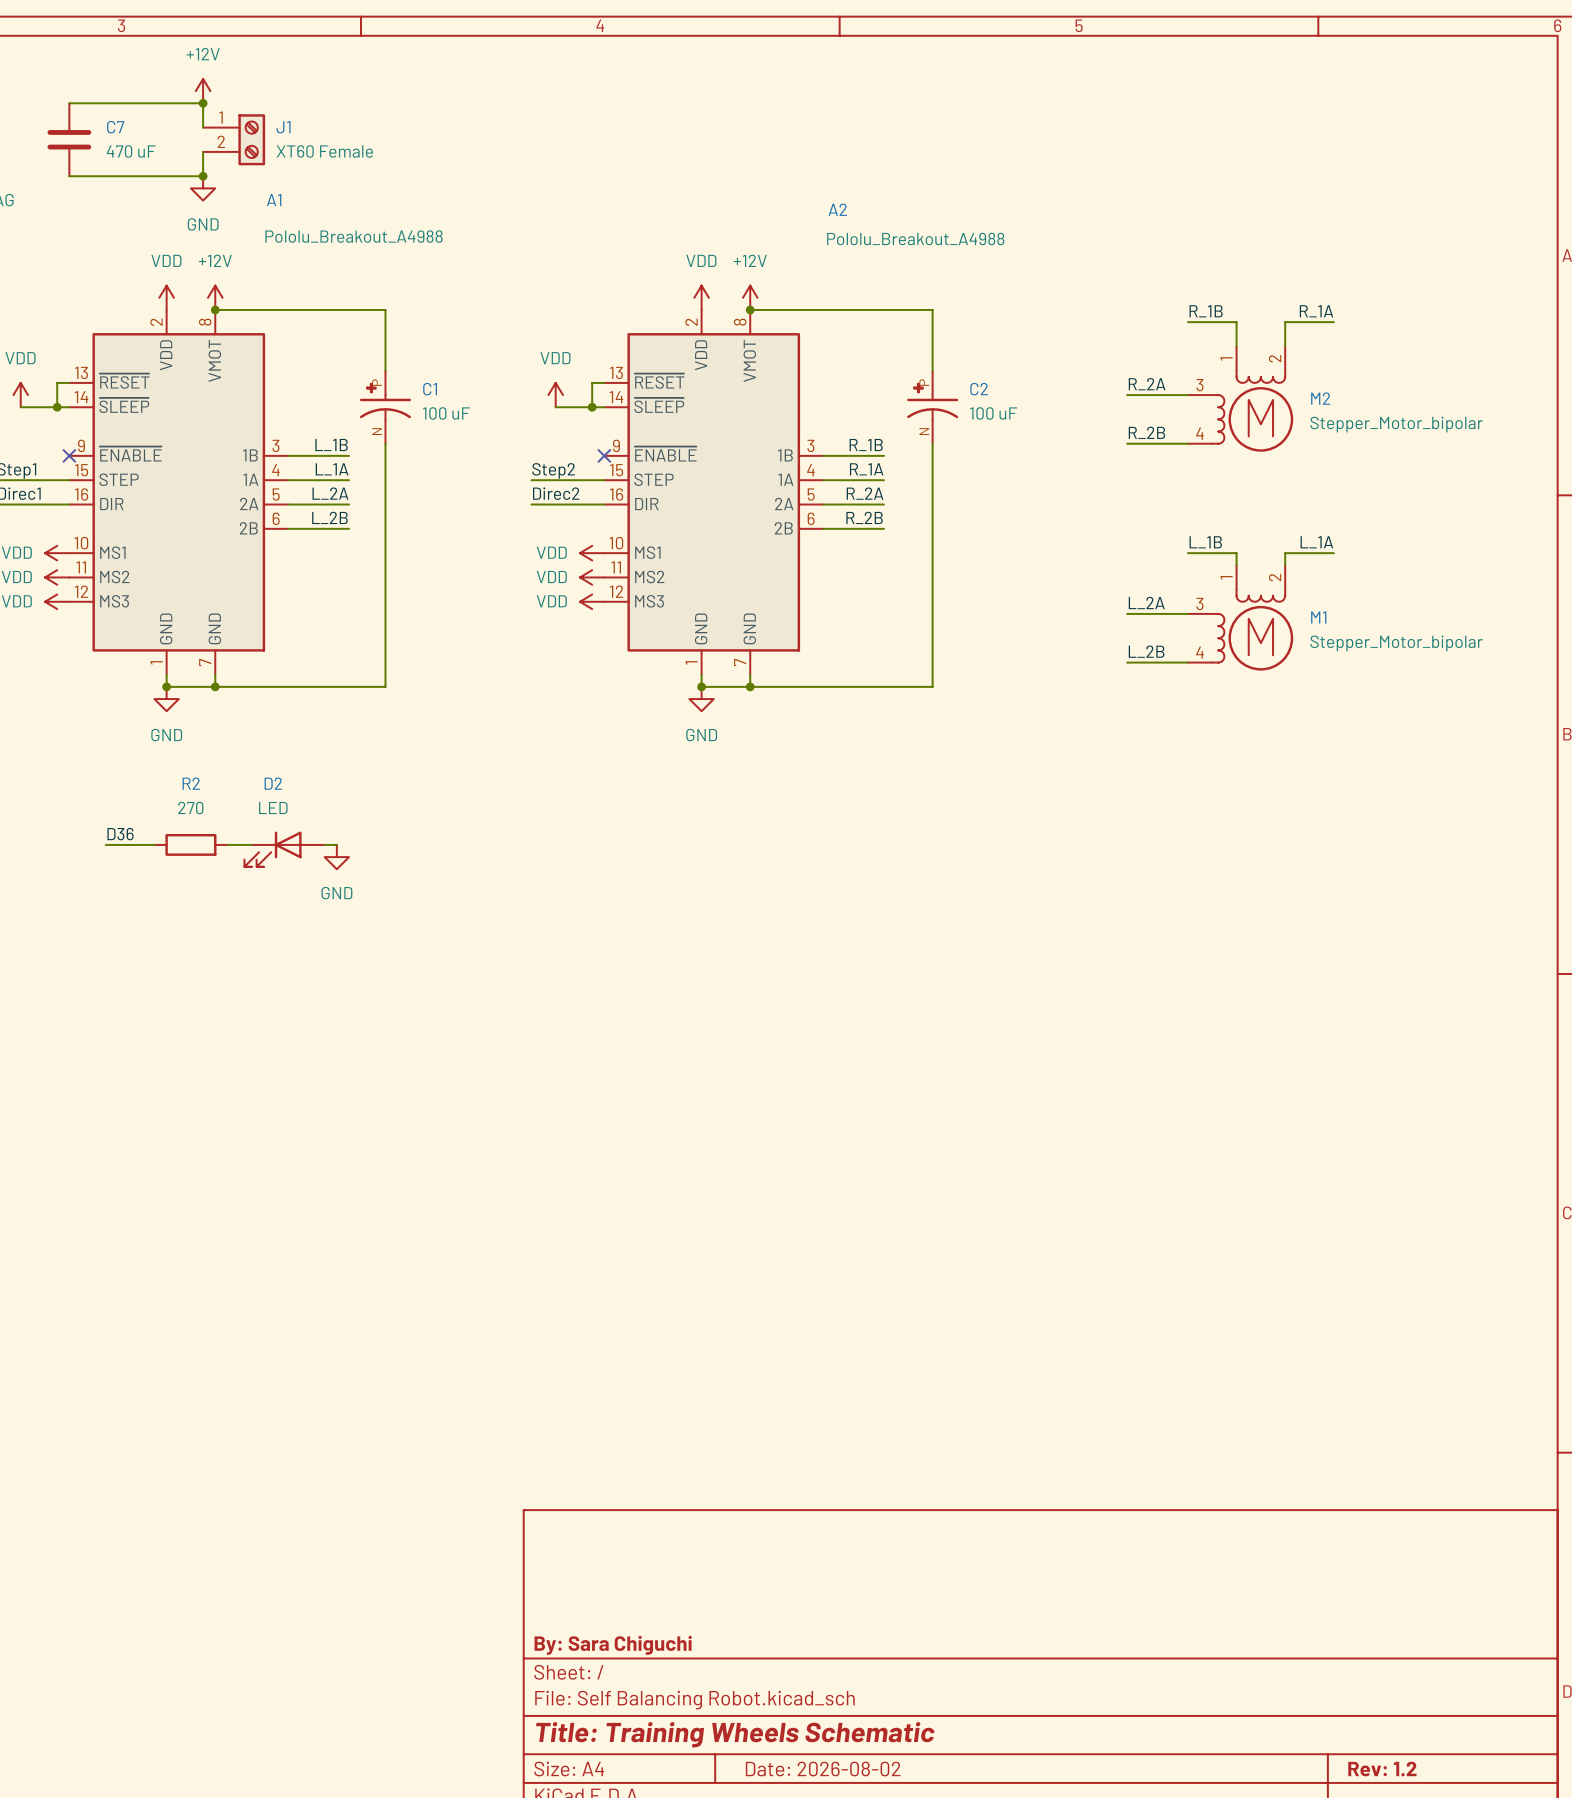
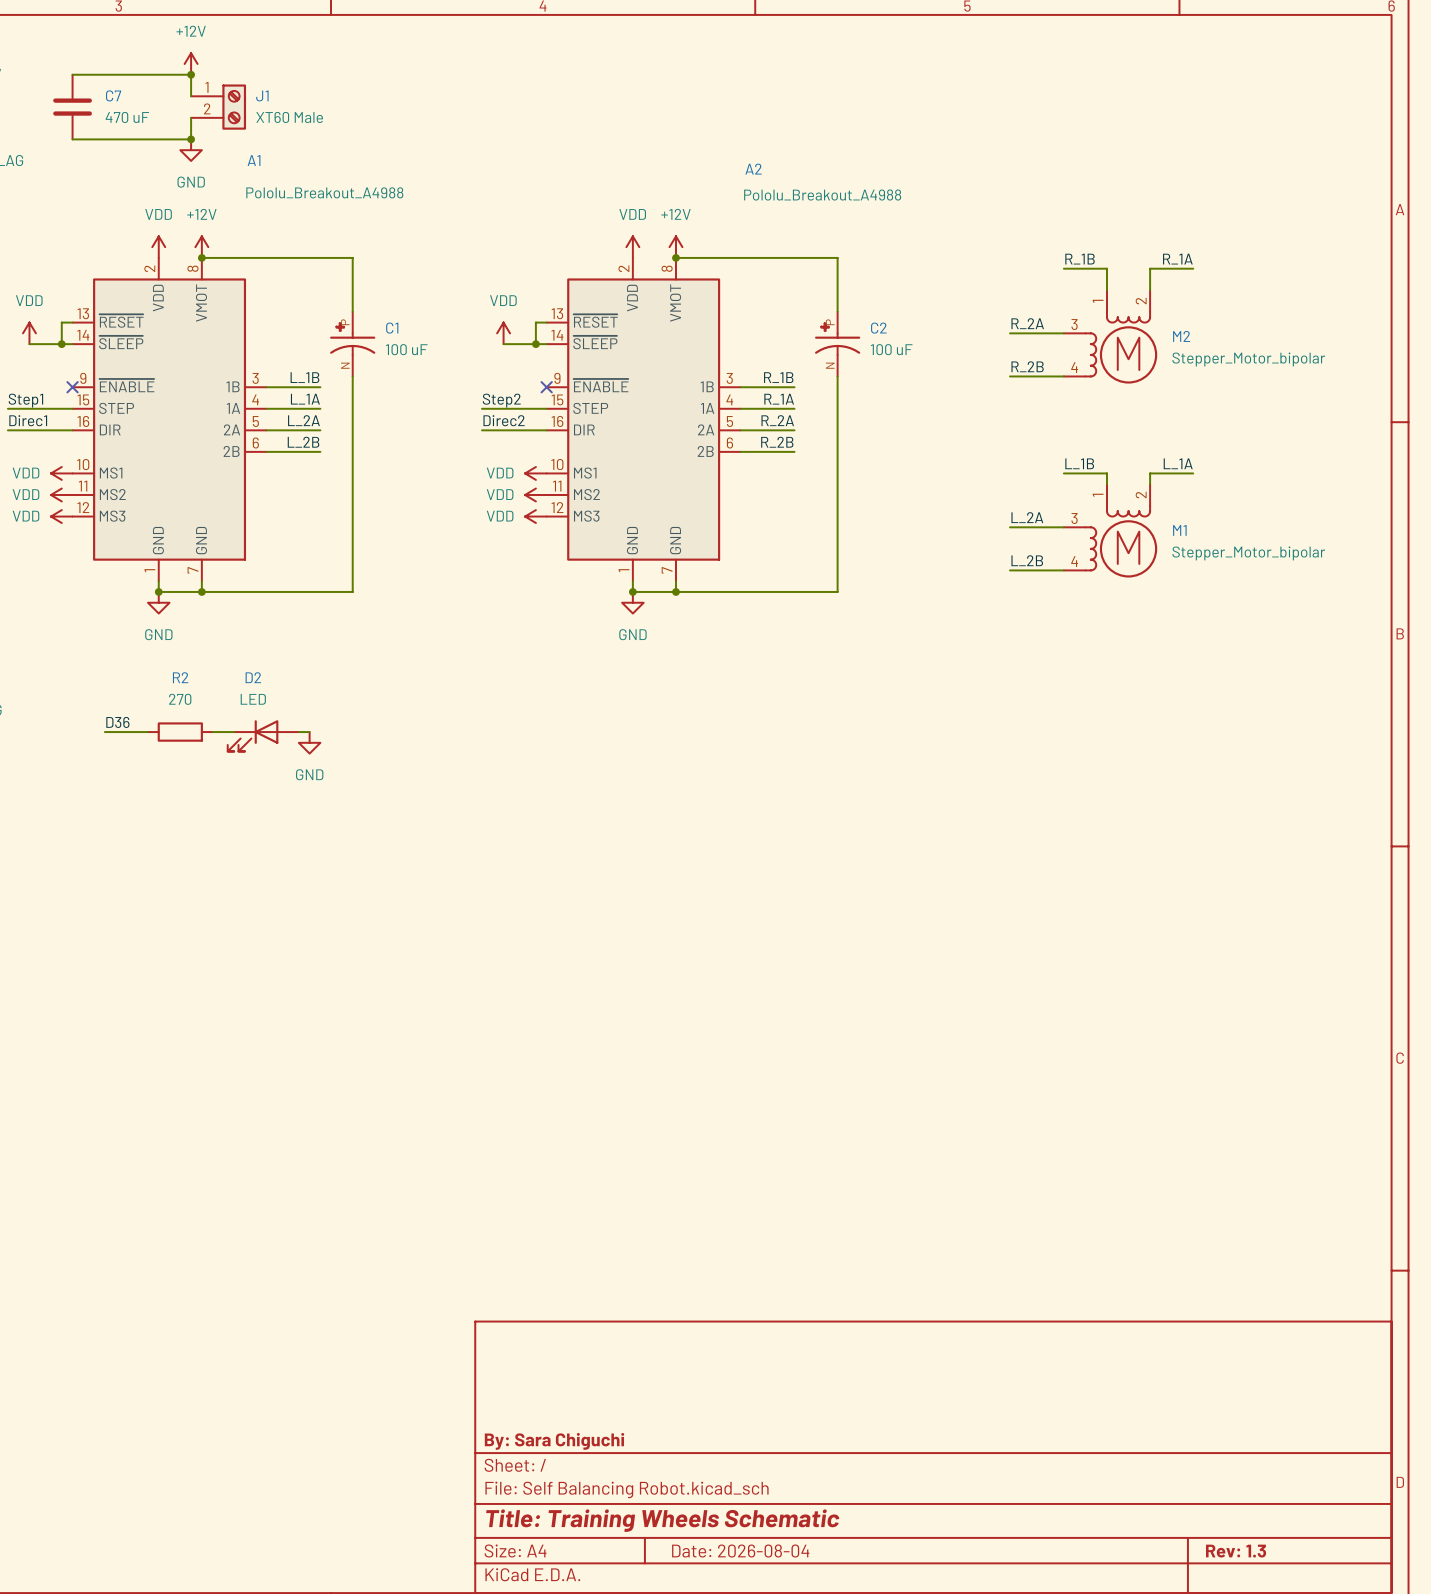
J1 value: XT60 Female (324, 151) -> XT60 Male (289, 117)
title block: Date: 2026-08-02 (823, 1769) -> Date: 2026-08-04 (740, 1551)
title block: Rev: 1.2 (1382, 1769) -> Rev: 1.3 (1236, 1551)

